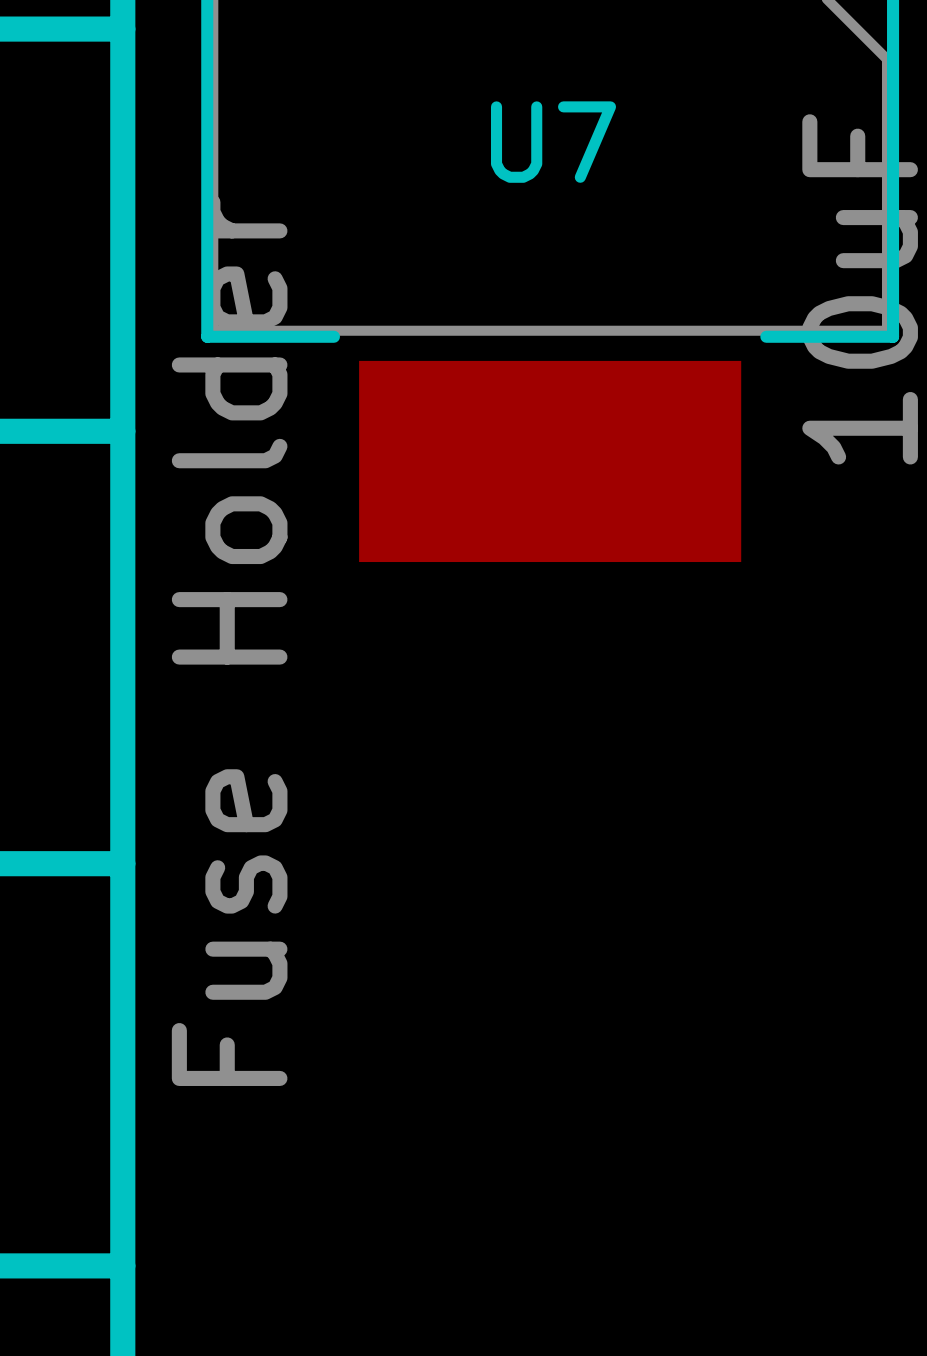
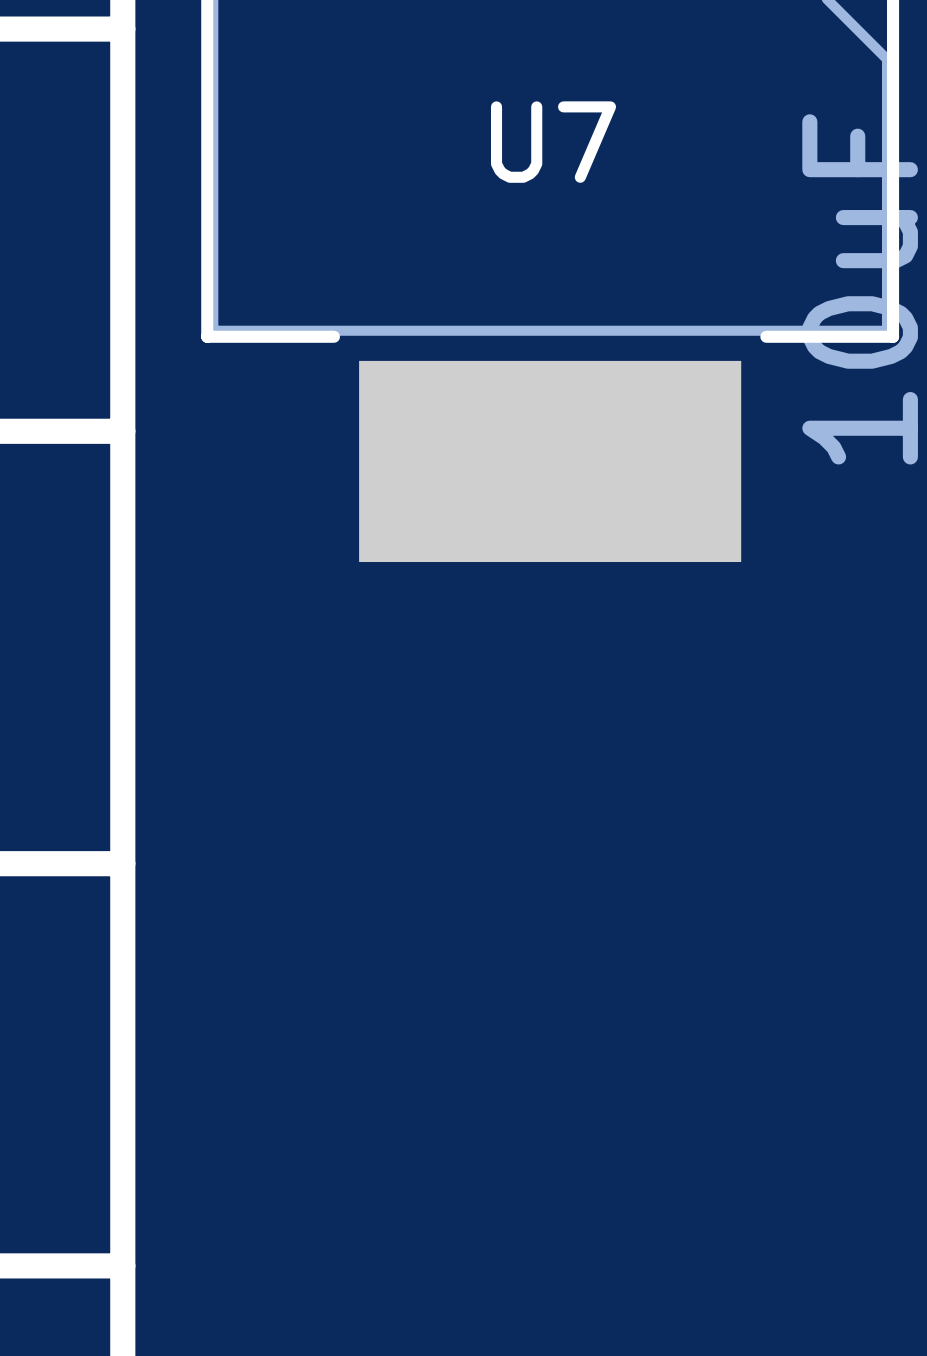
part value: Fuse Holder (229, 640) -> none

